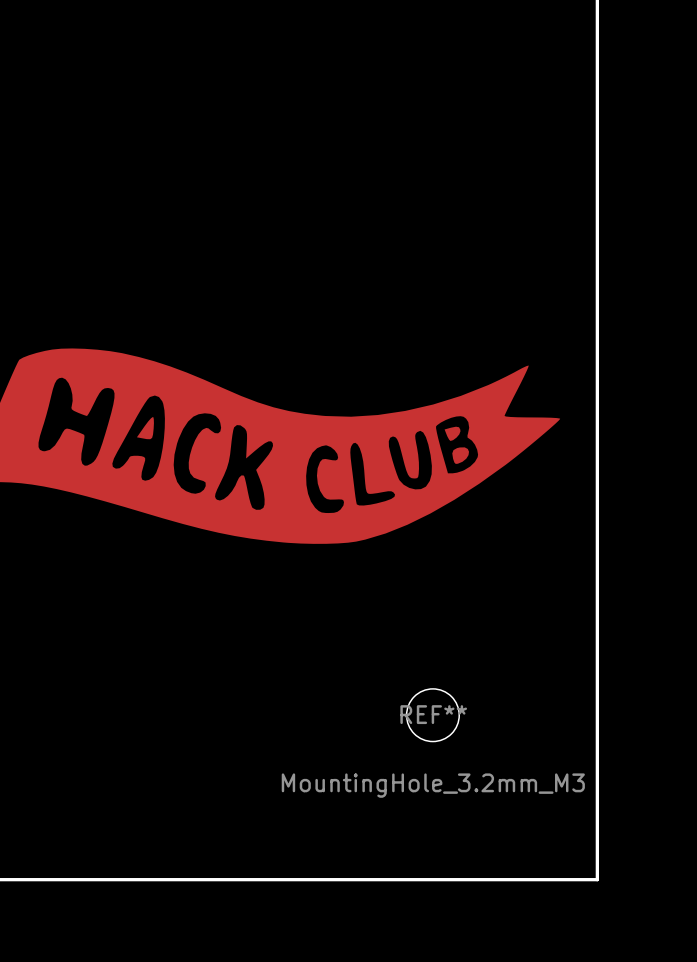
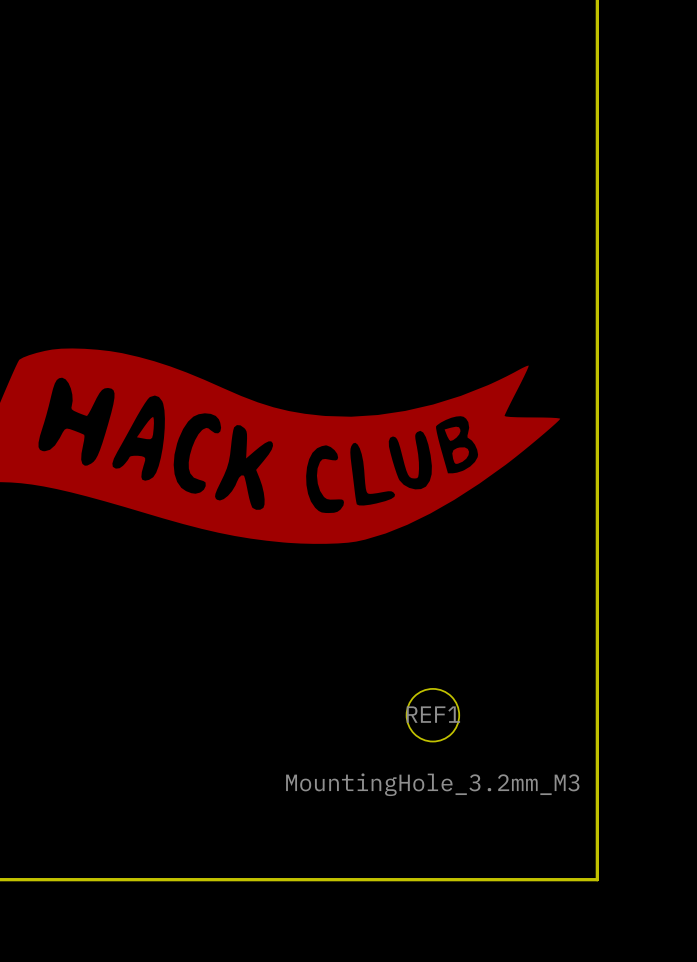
REF** name: REF** (433, 714) -> REF1 (433, 714)

